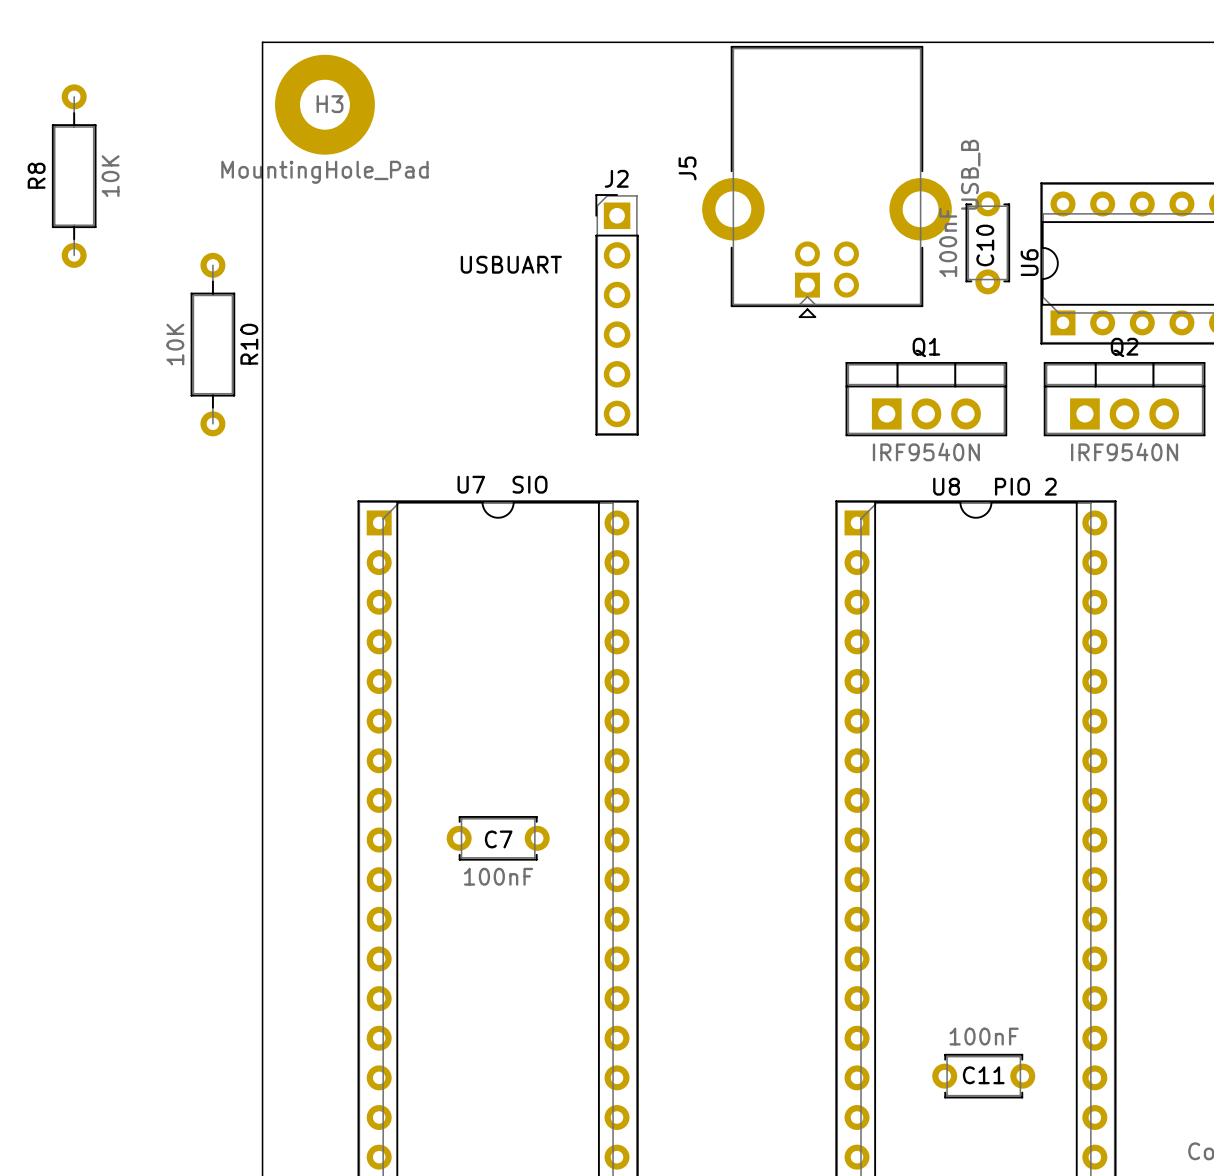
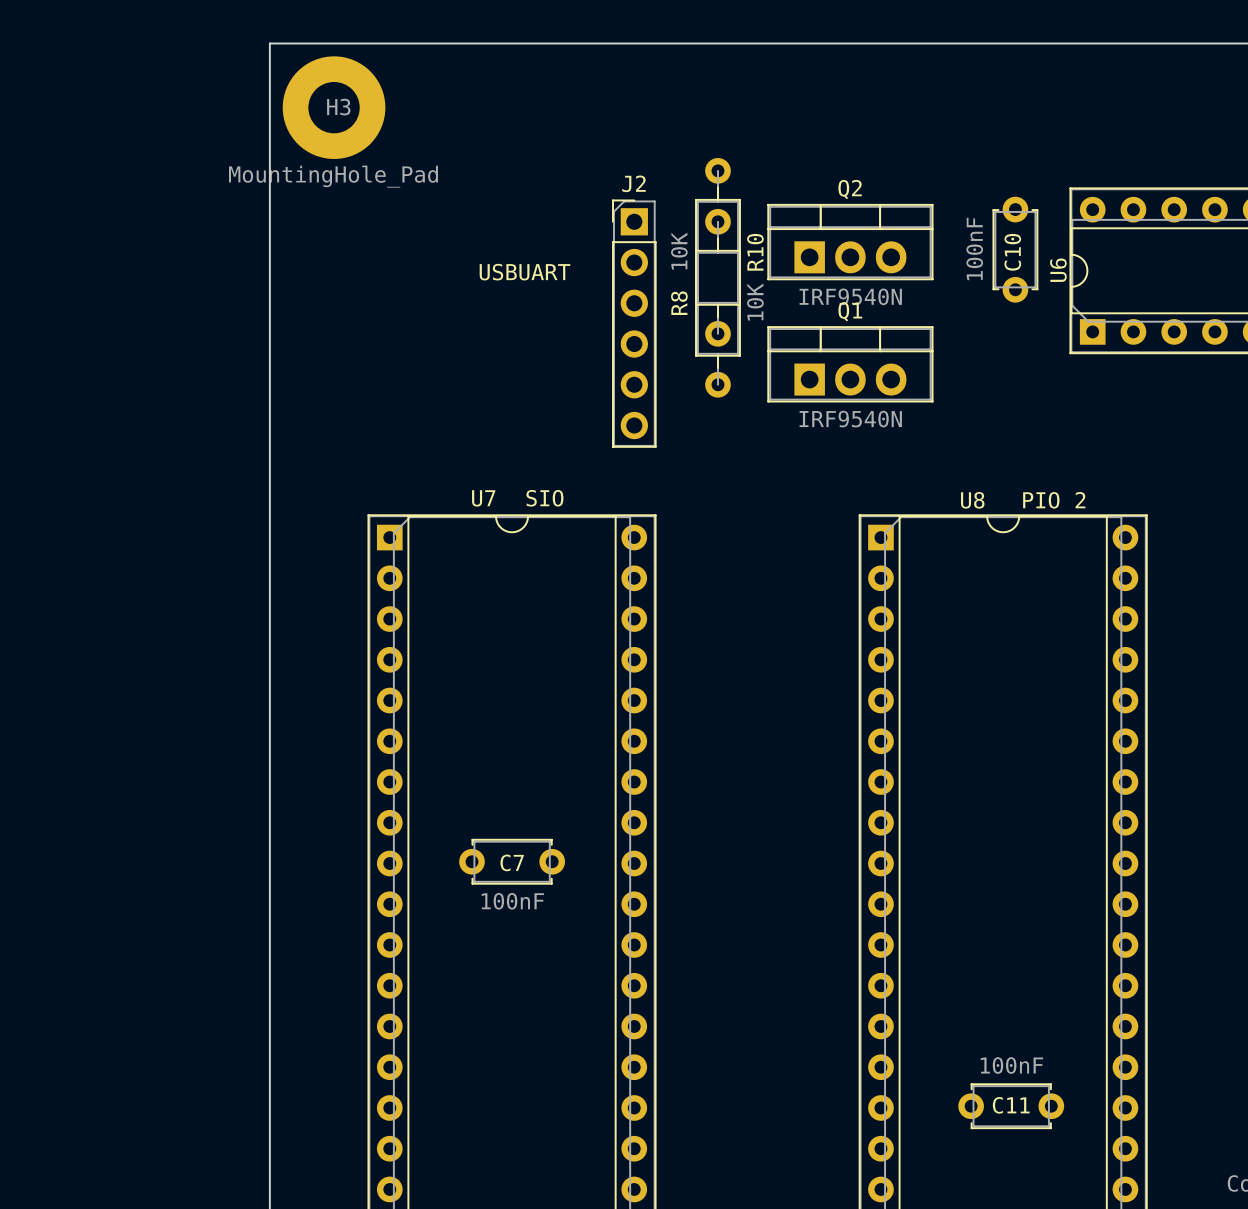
R8 position: (74, 176) -> (717, 303)
J5: USB_B (826, 181) -> none
R10 position: (212, 344) -> (717, 252)
Q1 position: (926, 399) -> (850, 364)
Q2 position: (1124, 399) -> (850, 242)

